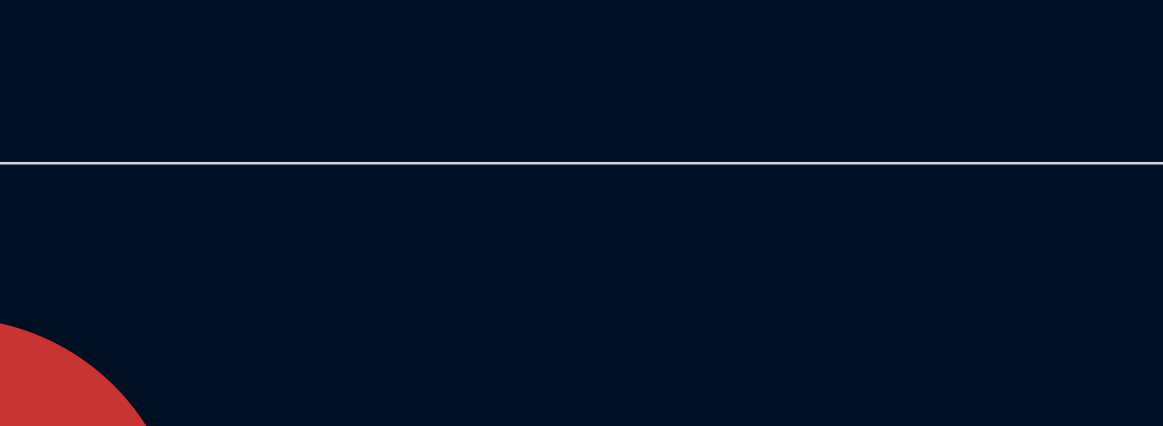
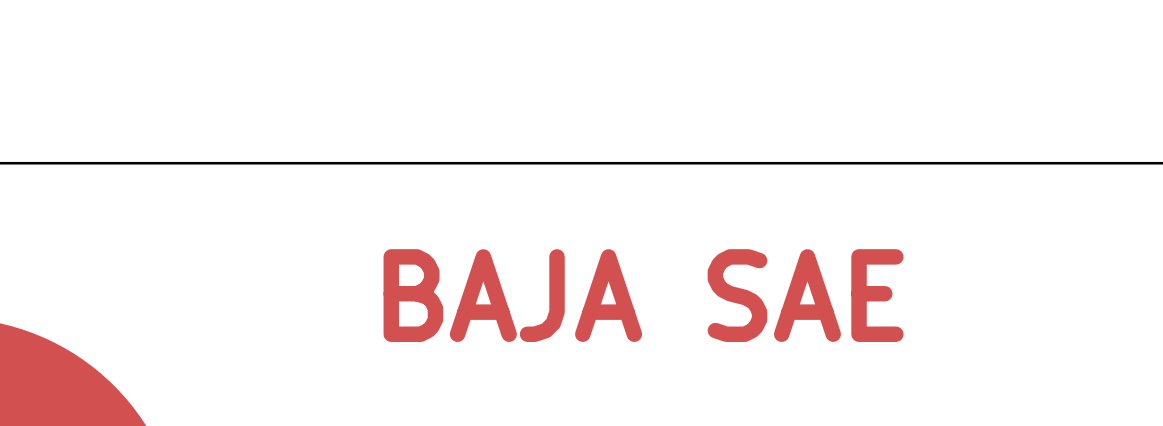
text: none -> BAJA SAE (643, 295)

